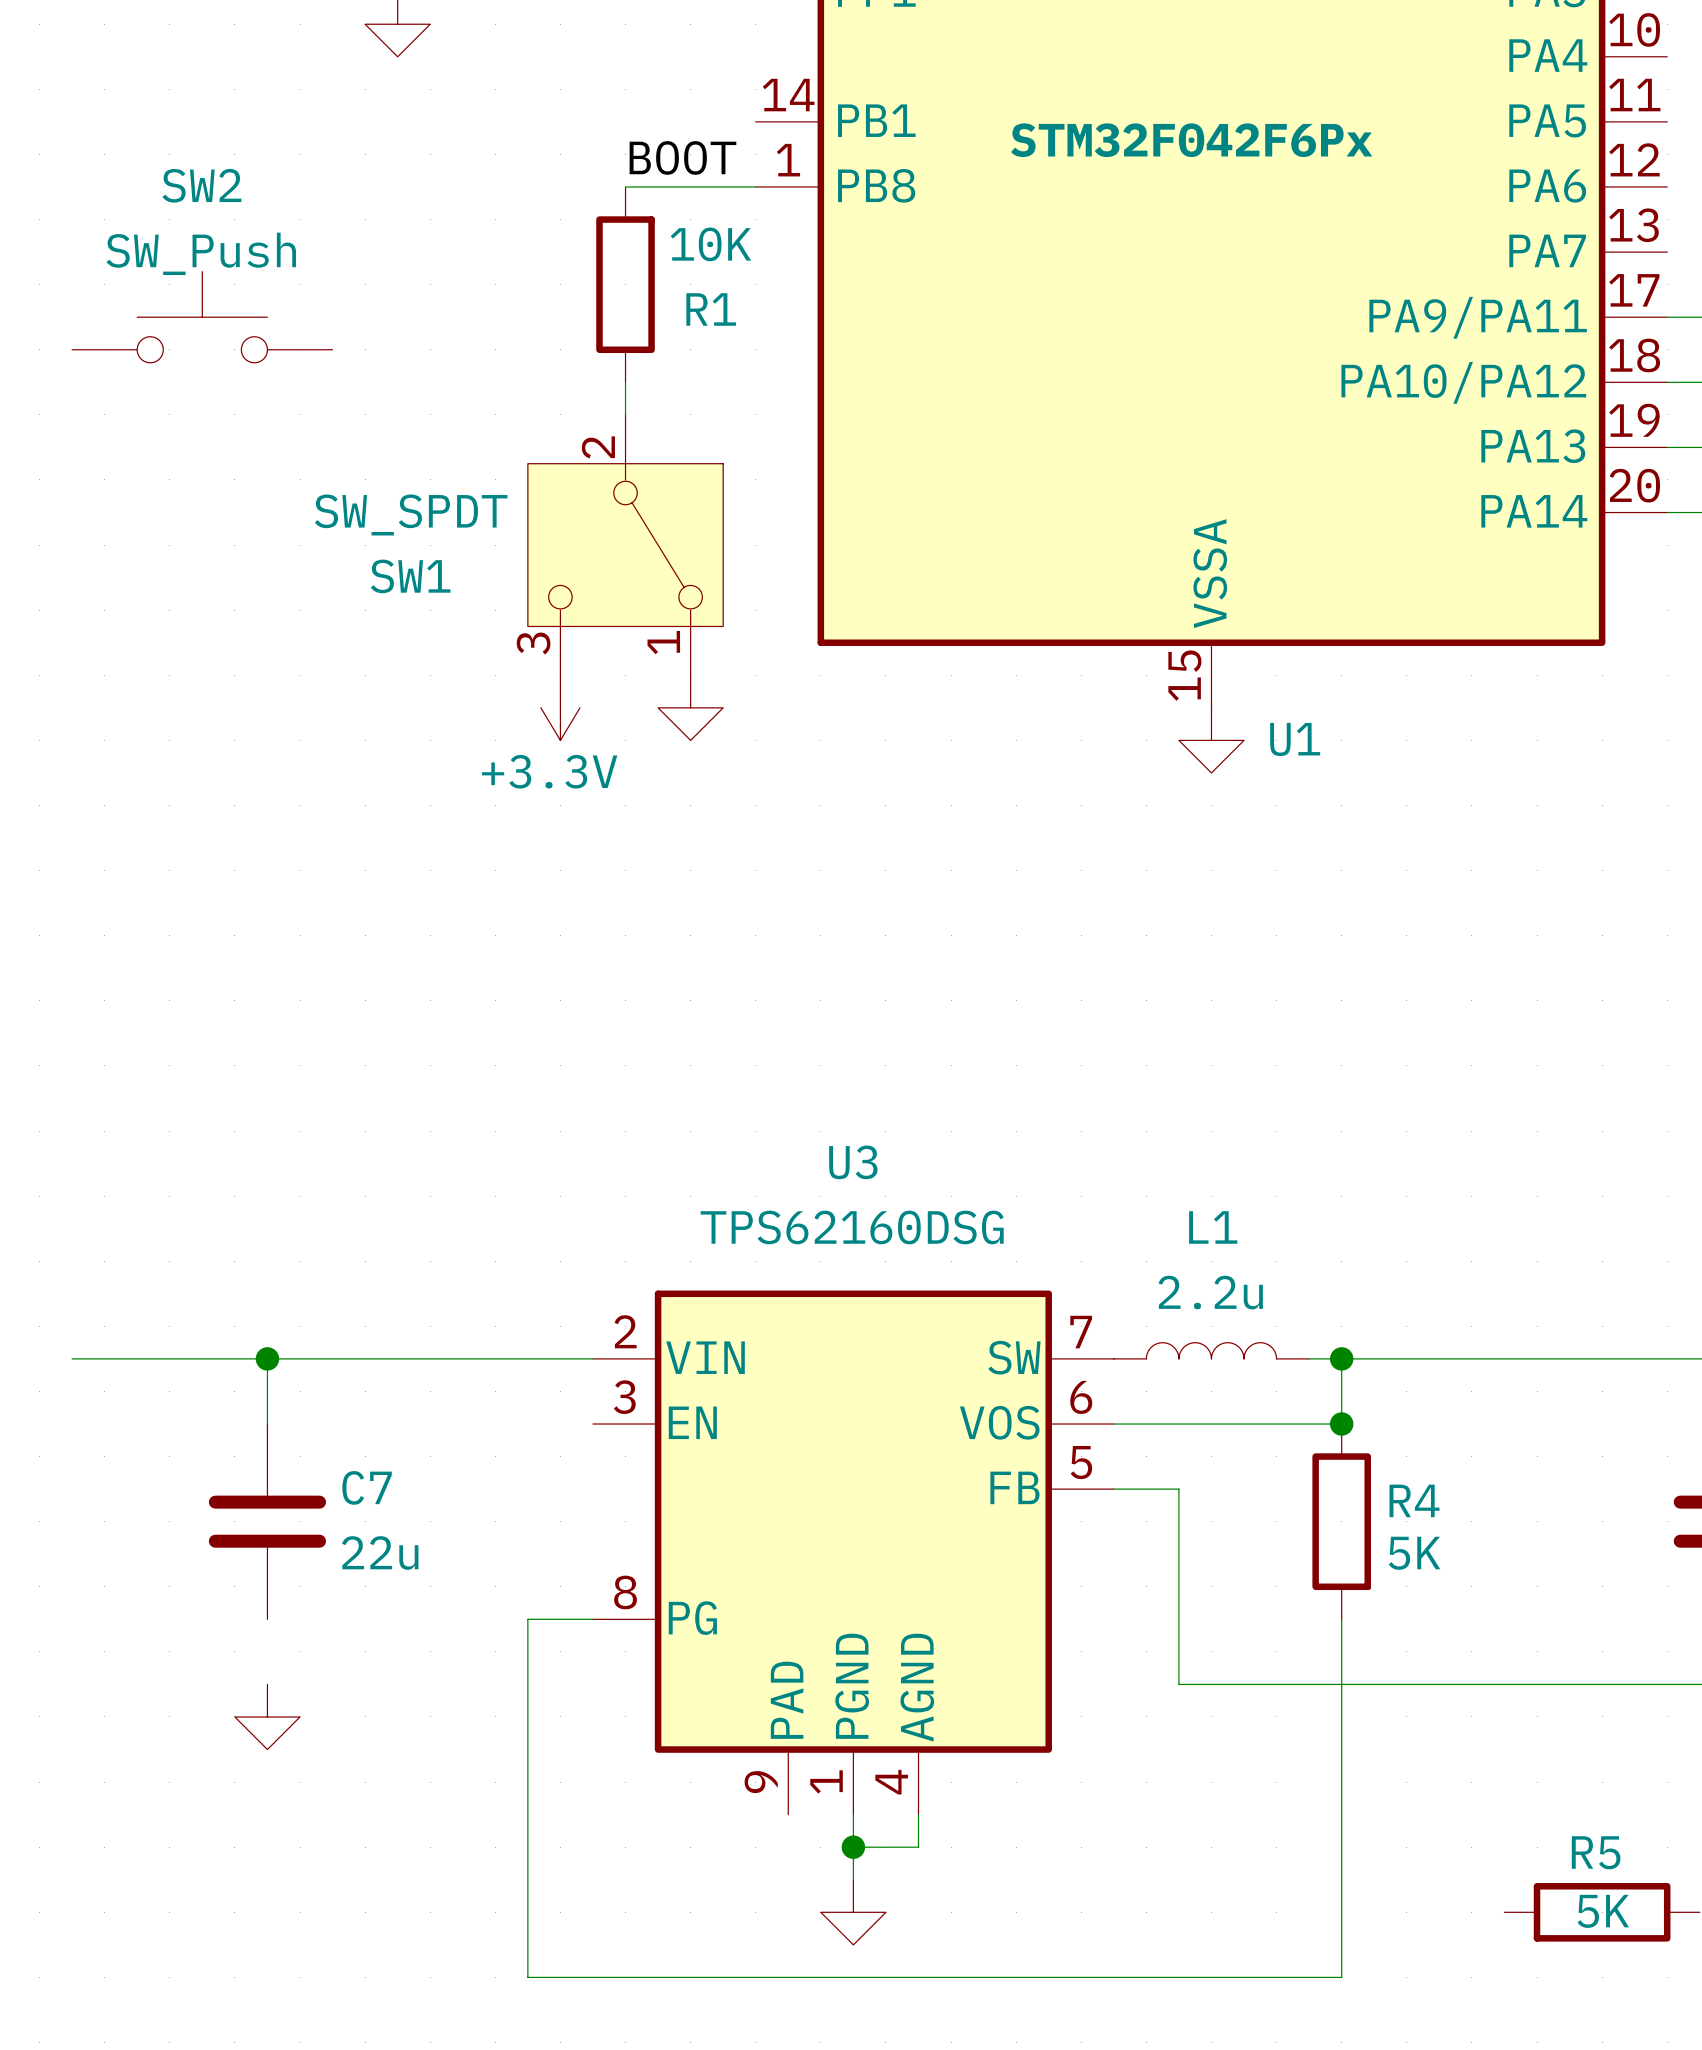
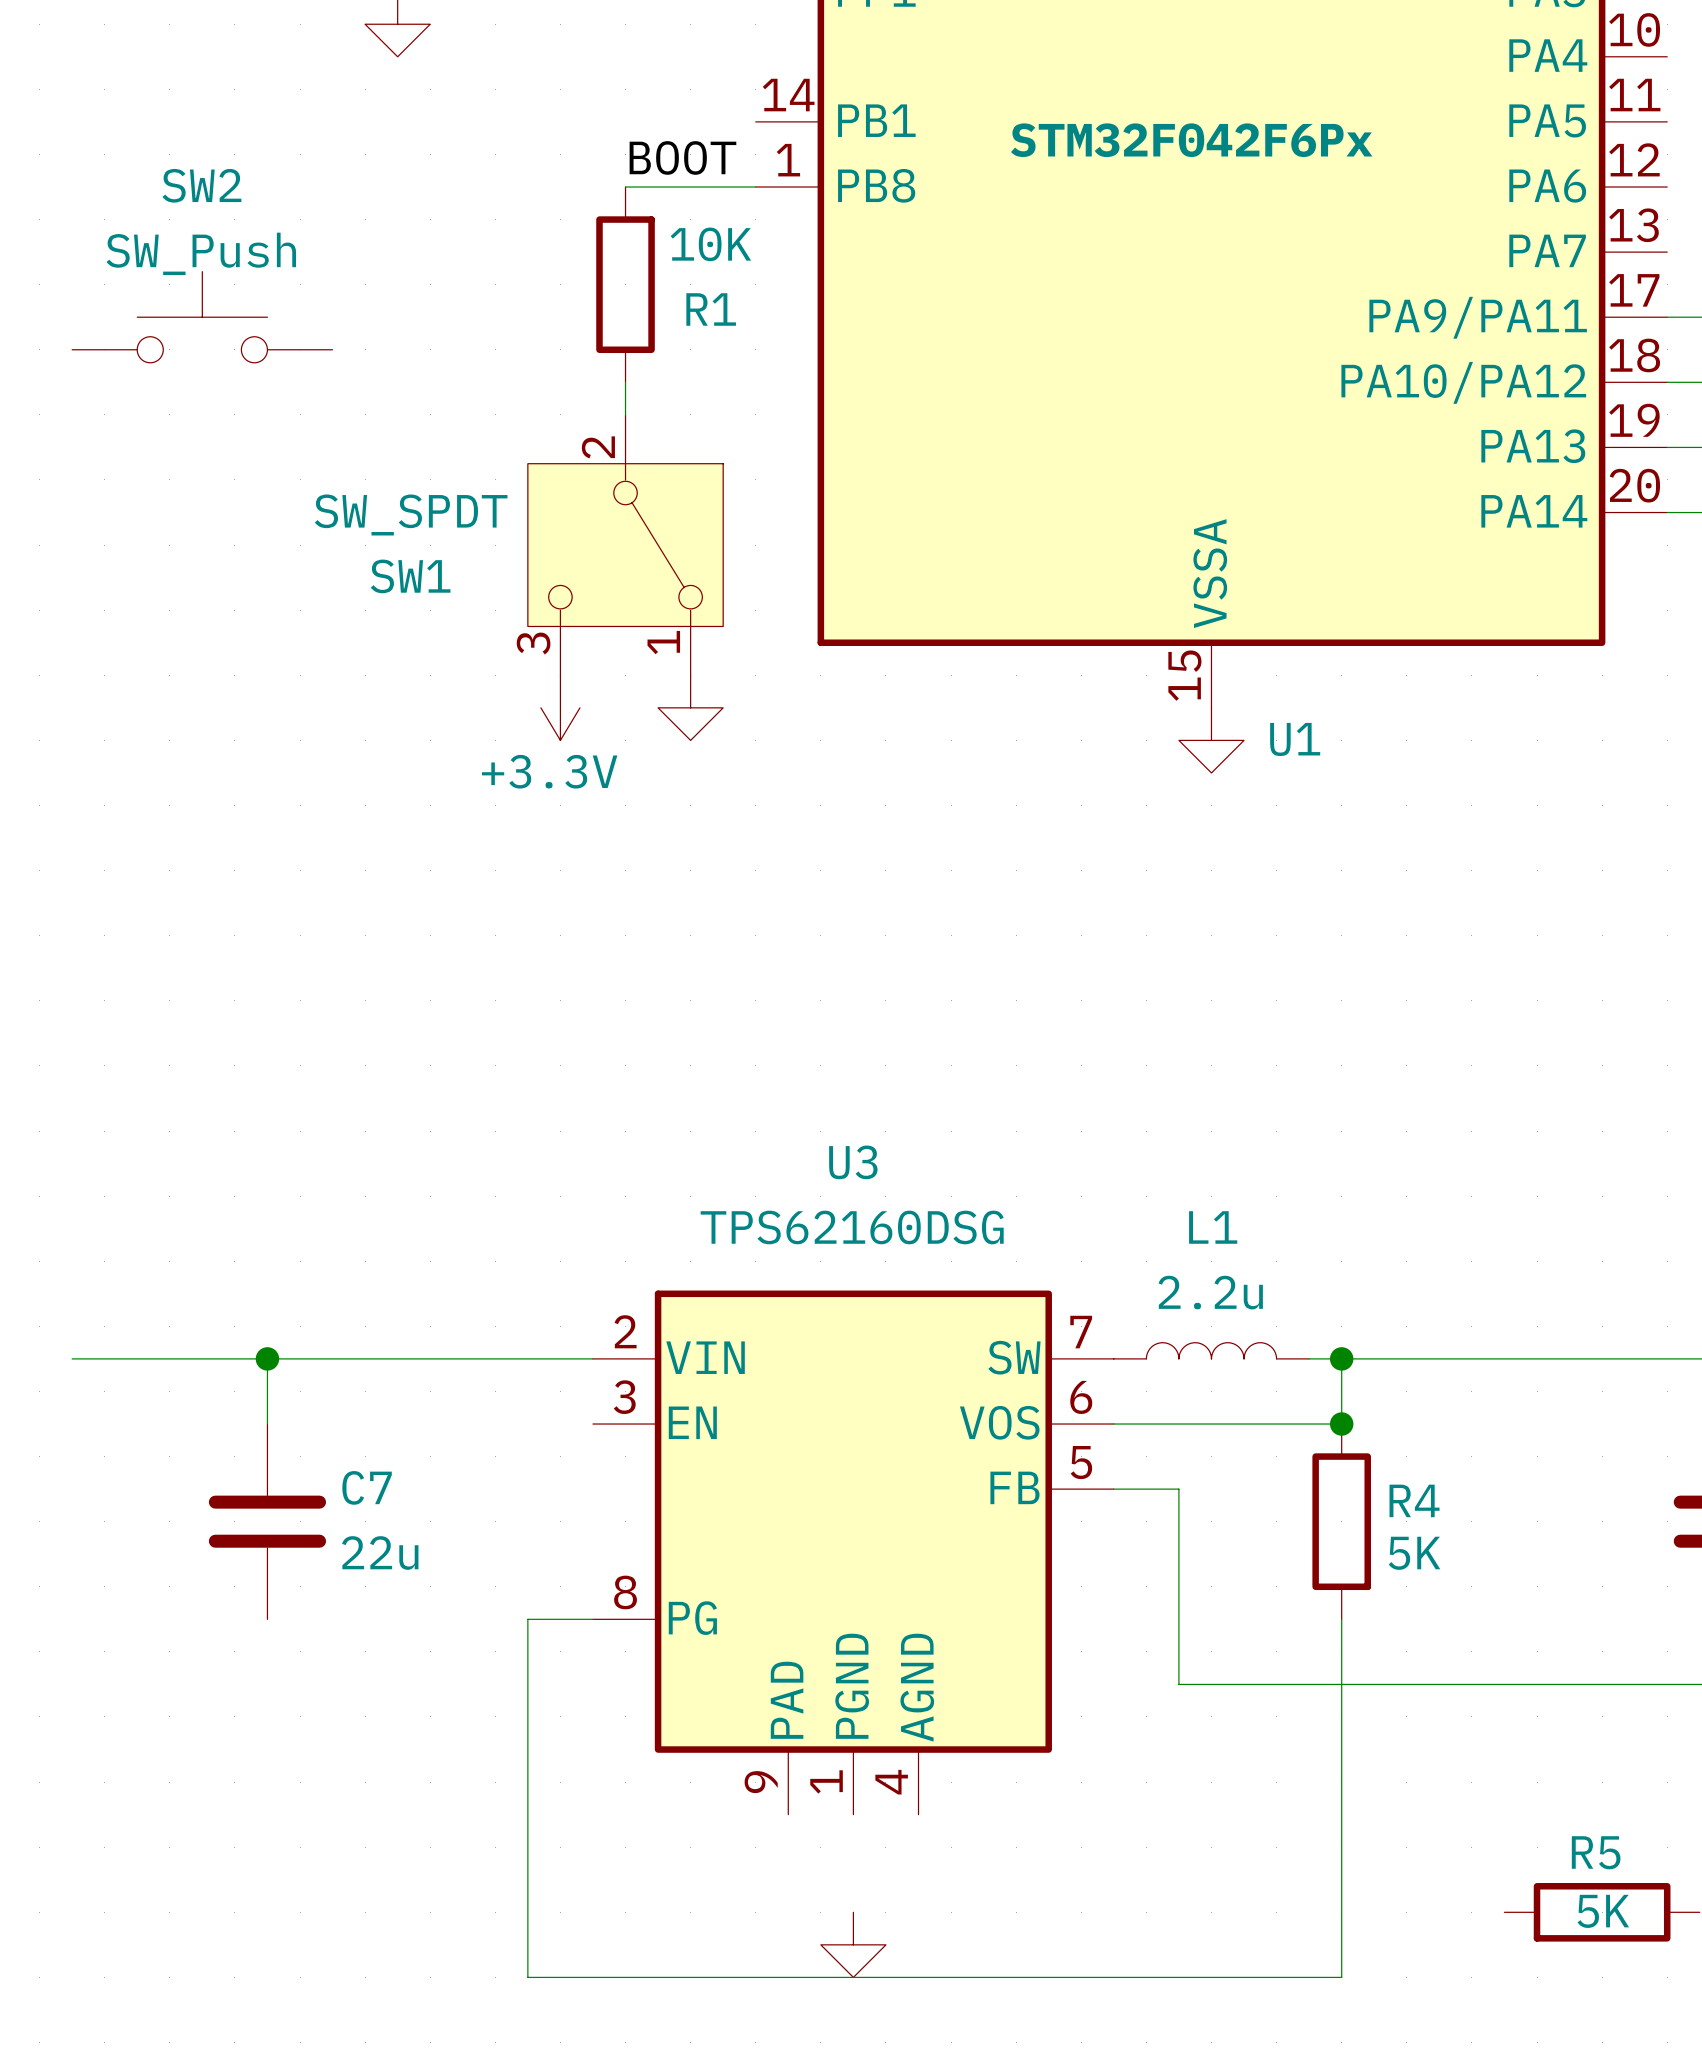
power symbol: (267, 1716) -> none
wire: (853, 1814) (853, 1879) -> none
wire: (918, 1814) (918, 1847) (853, 1847) -> none
junction: (853, 1847) -> none
power symbol position: (853, 1912) -> (853, 1944)

